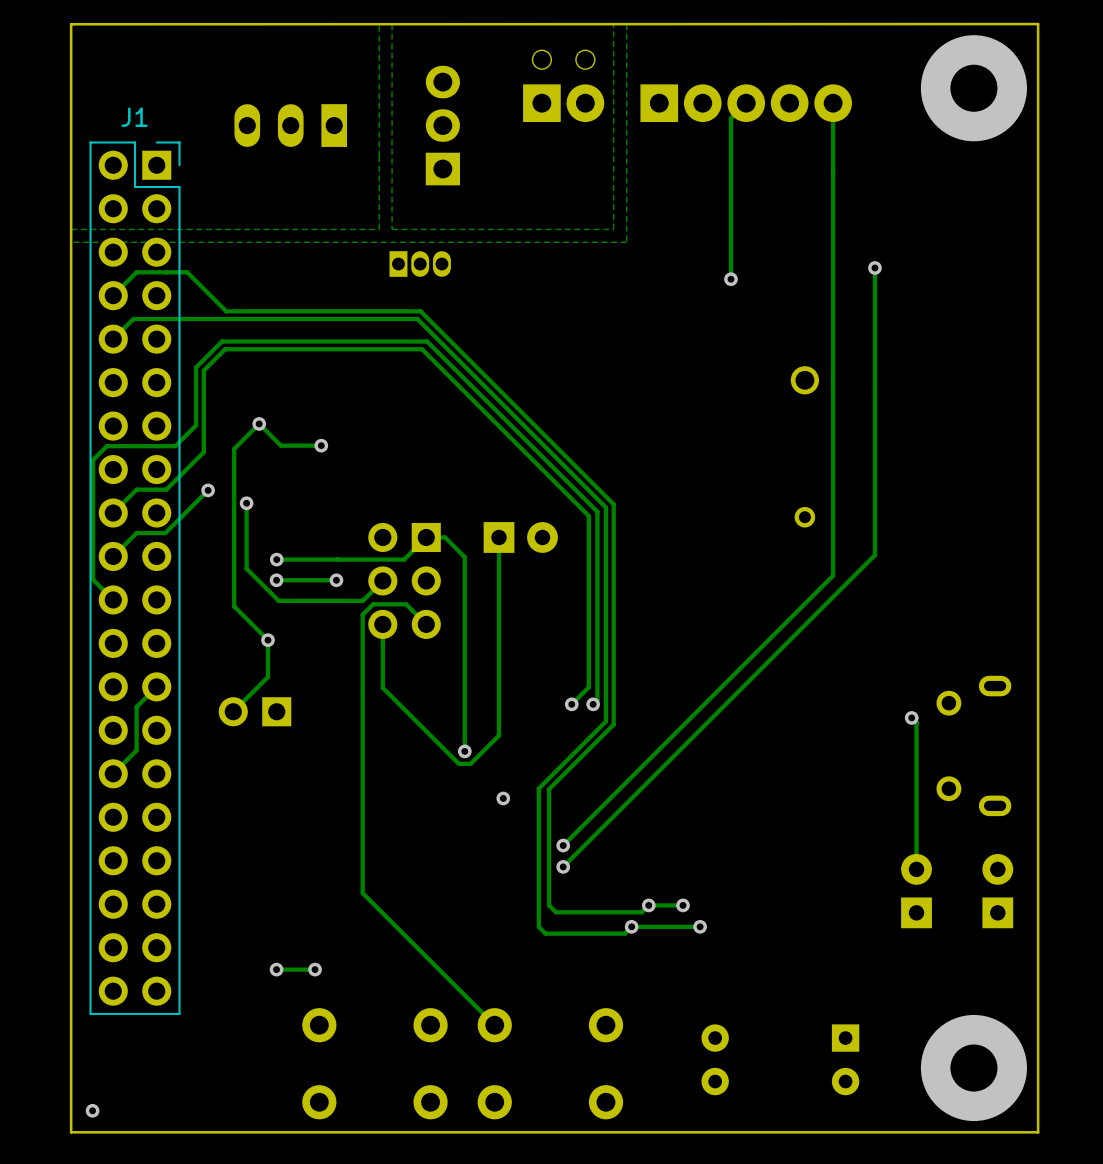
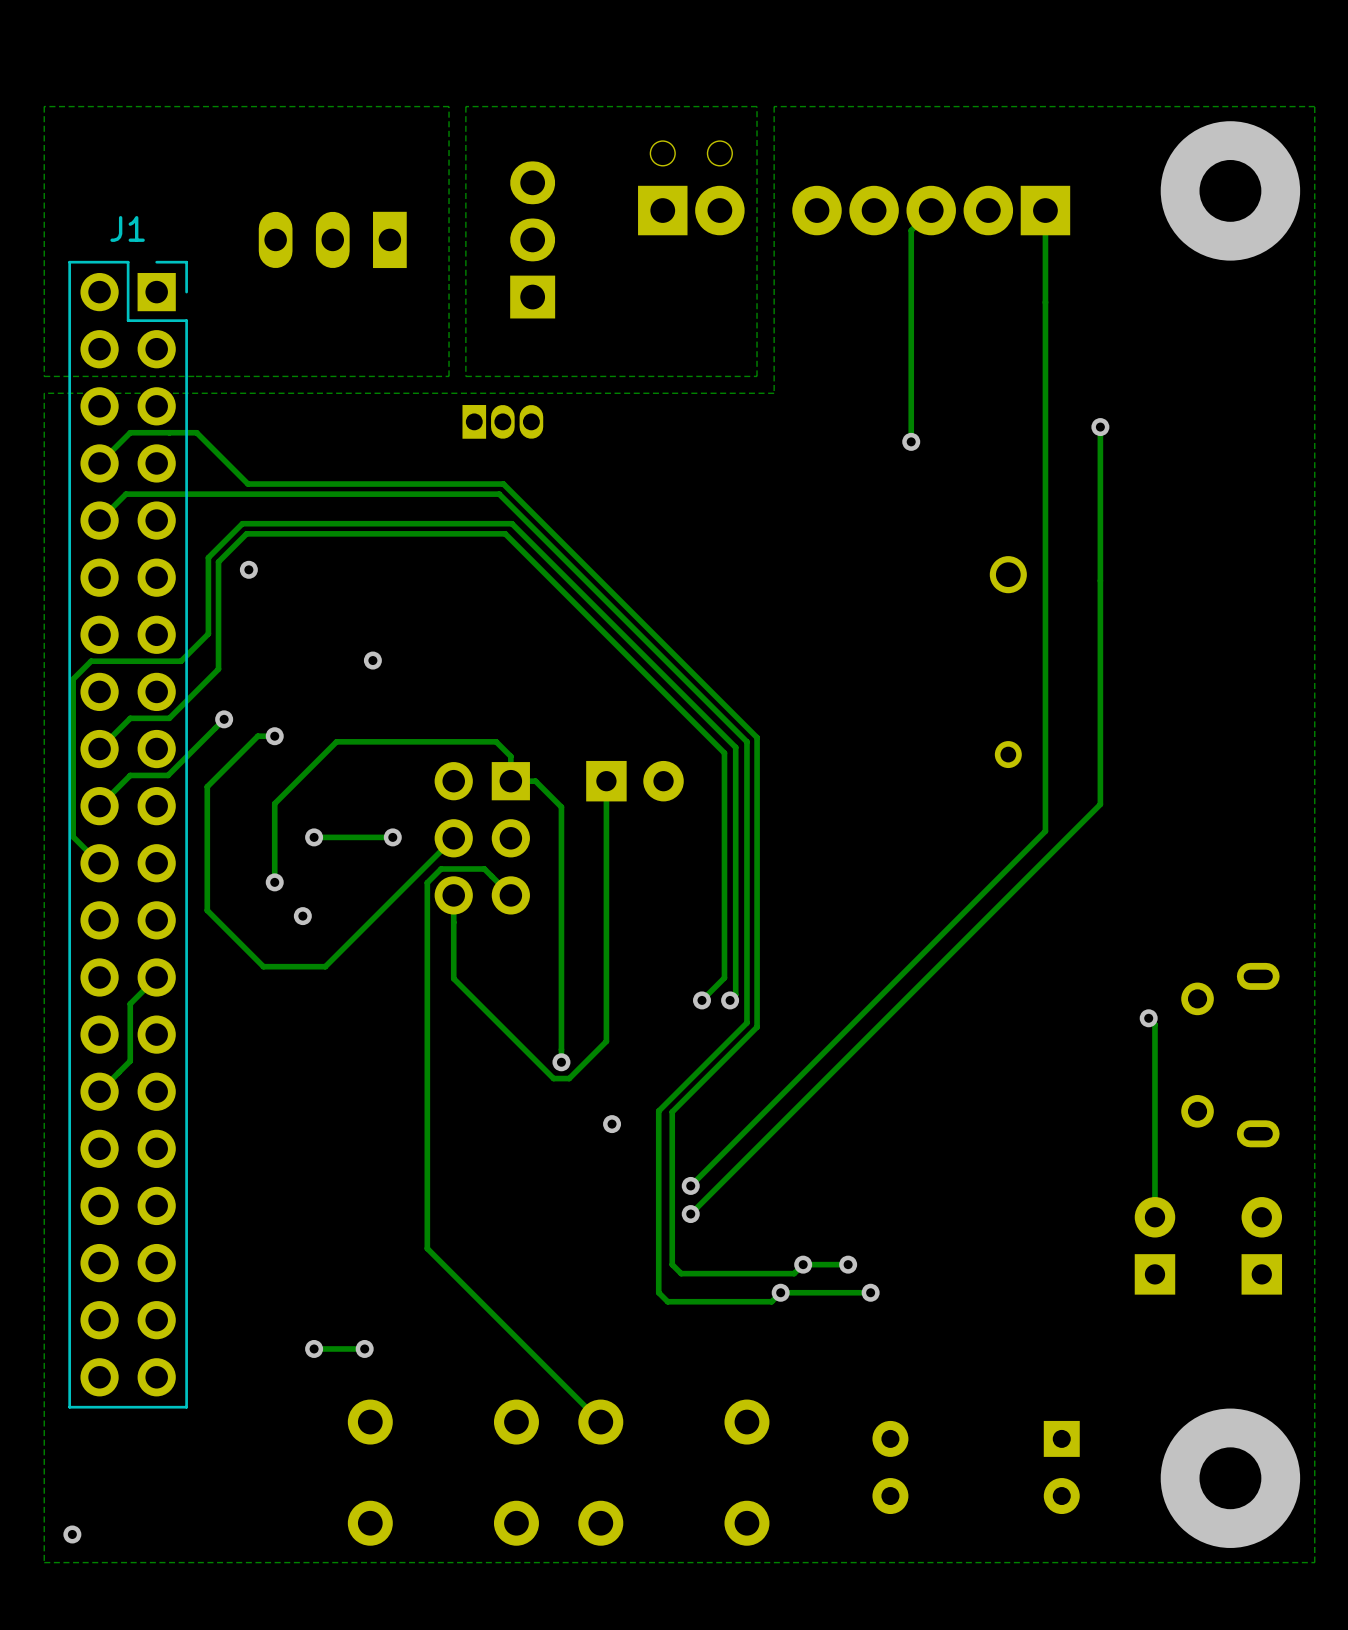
board edge: (1038, 24) (1038, 1132) (71, 1132) (71, 24) (1038, 24) -> none
part rotation: 0° (746, 103) -> 180° (931, 210)
via position: (259, 423) -> (248, 569)
track: (321, 445) (280, 445) (259, 423) (234, 448) (234, 606) (267, 640) (267, 677) (233, 711) -> none
track: (246, 503) (246, 554) -> none
track: (426, 537) (404, 559) (276, 559) -> (510, 781) (510, 756) (496, 741) (336, 741) (274, 803)
via position: (276, 559) -> (274, 882)
track: (246, 568) (278, 600) (362, 600) -> (274, 736) (257, 736) (207, 786) (207, 910) (263, 966) (325, 966) (427, 864)
track: none -> (274, 822) (274, 882)
part: (255, 711) -> none

